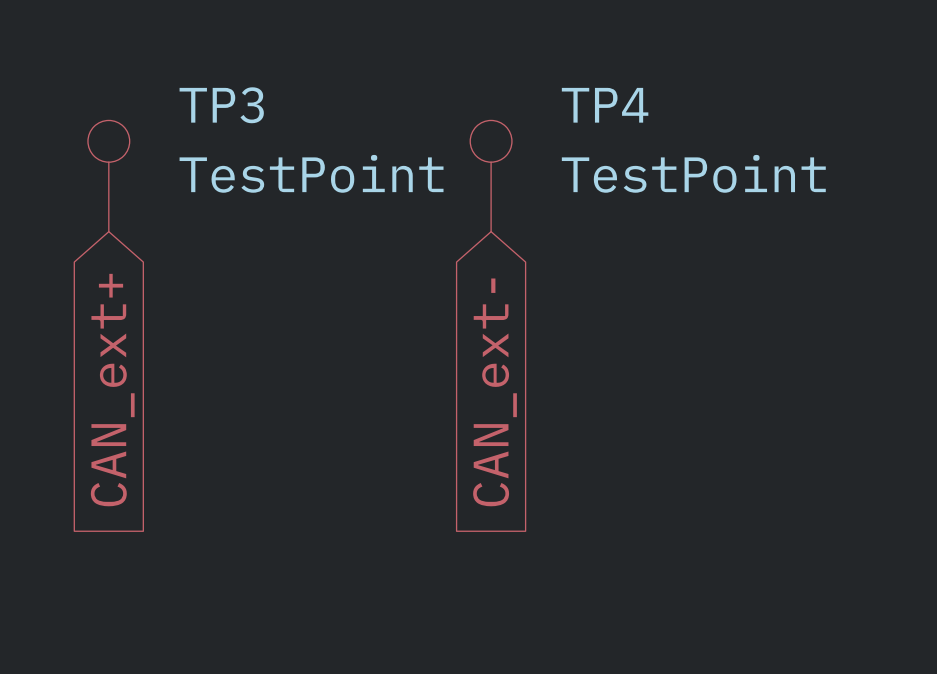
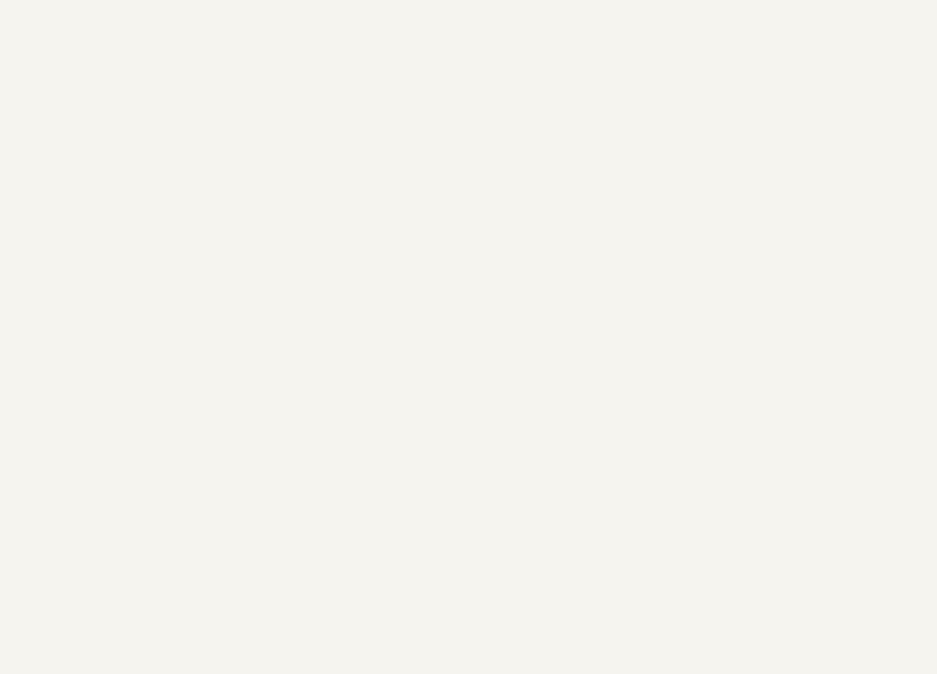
TP3: TestPoint (108, 176) -> none
TP4: TestPoint (491, 176) -> none
global label: CAN_ext+ (112, 390) -> none
global label: CAN_ext- (495, 392) -> none

